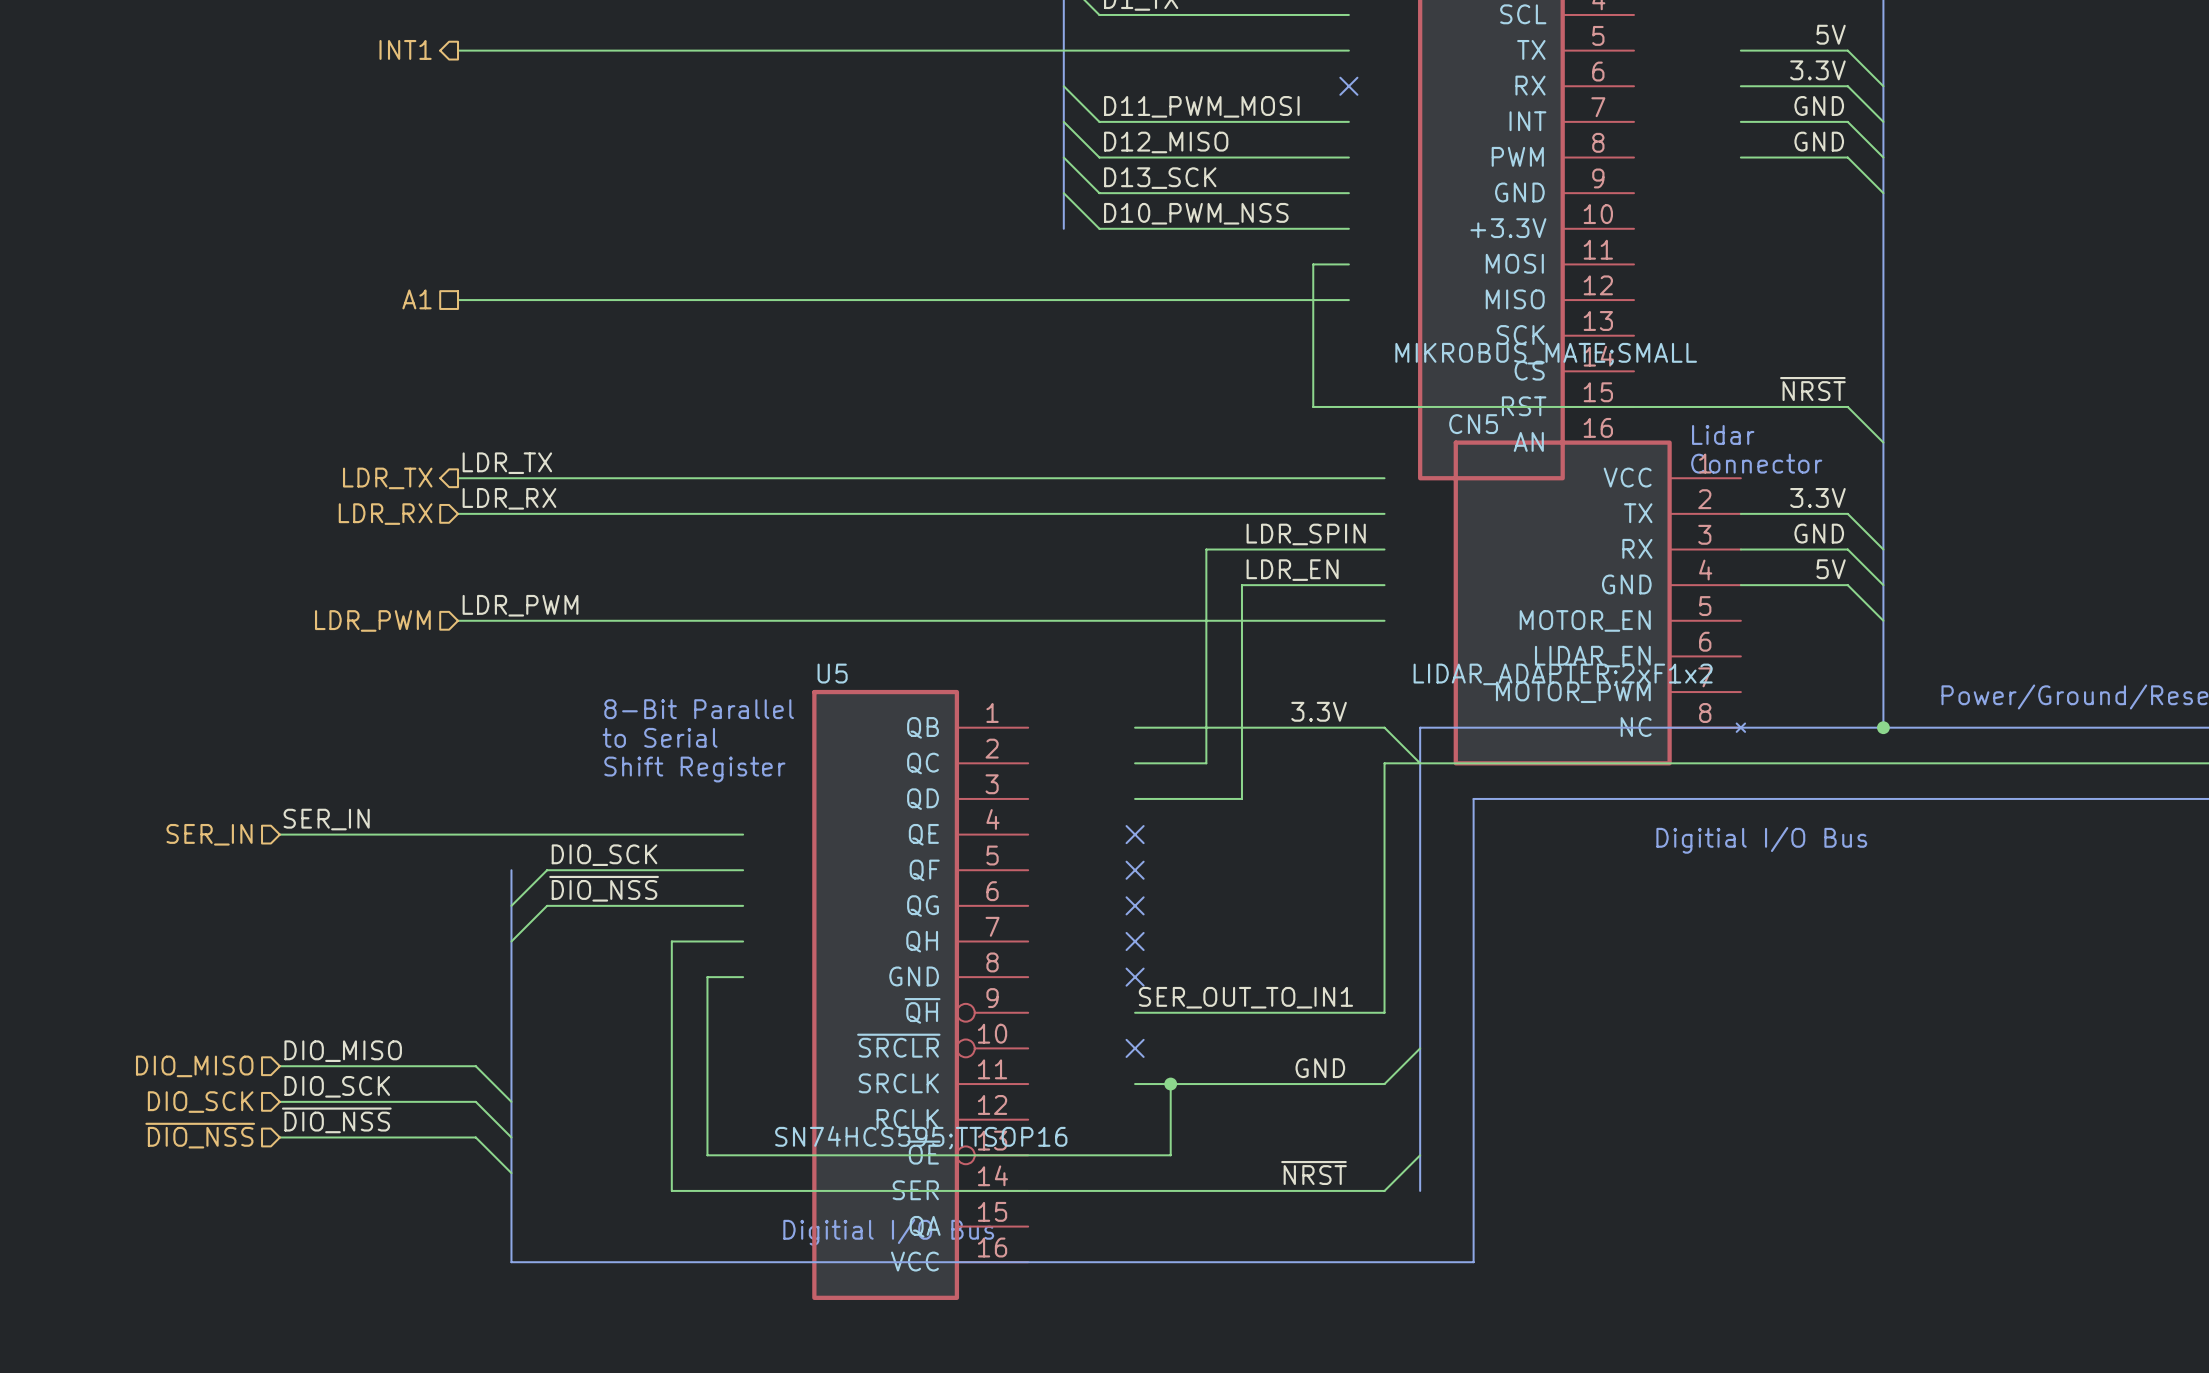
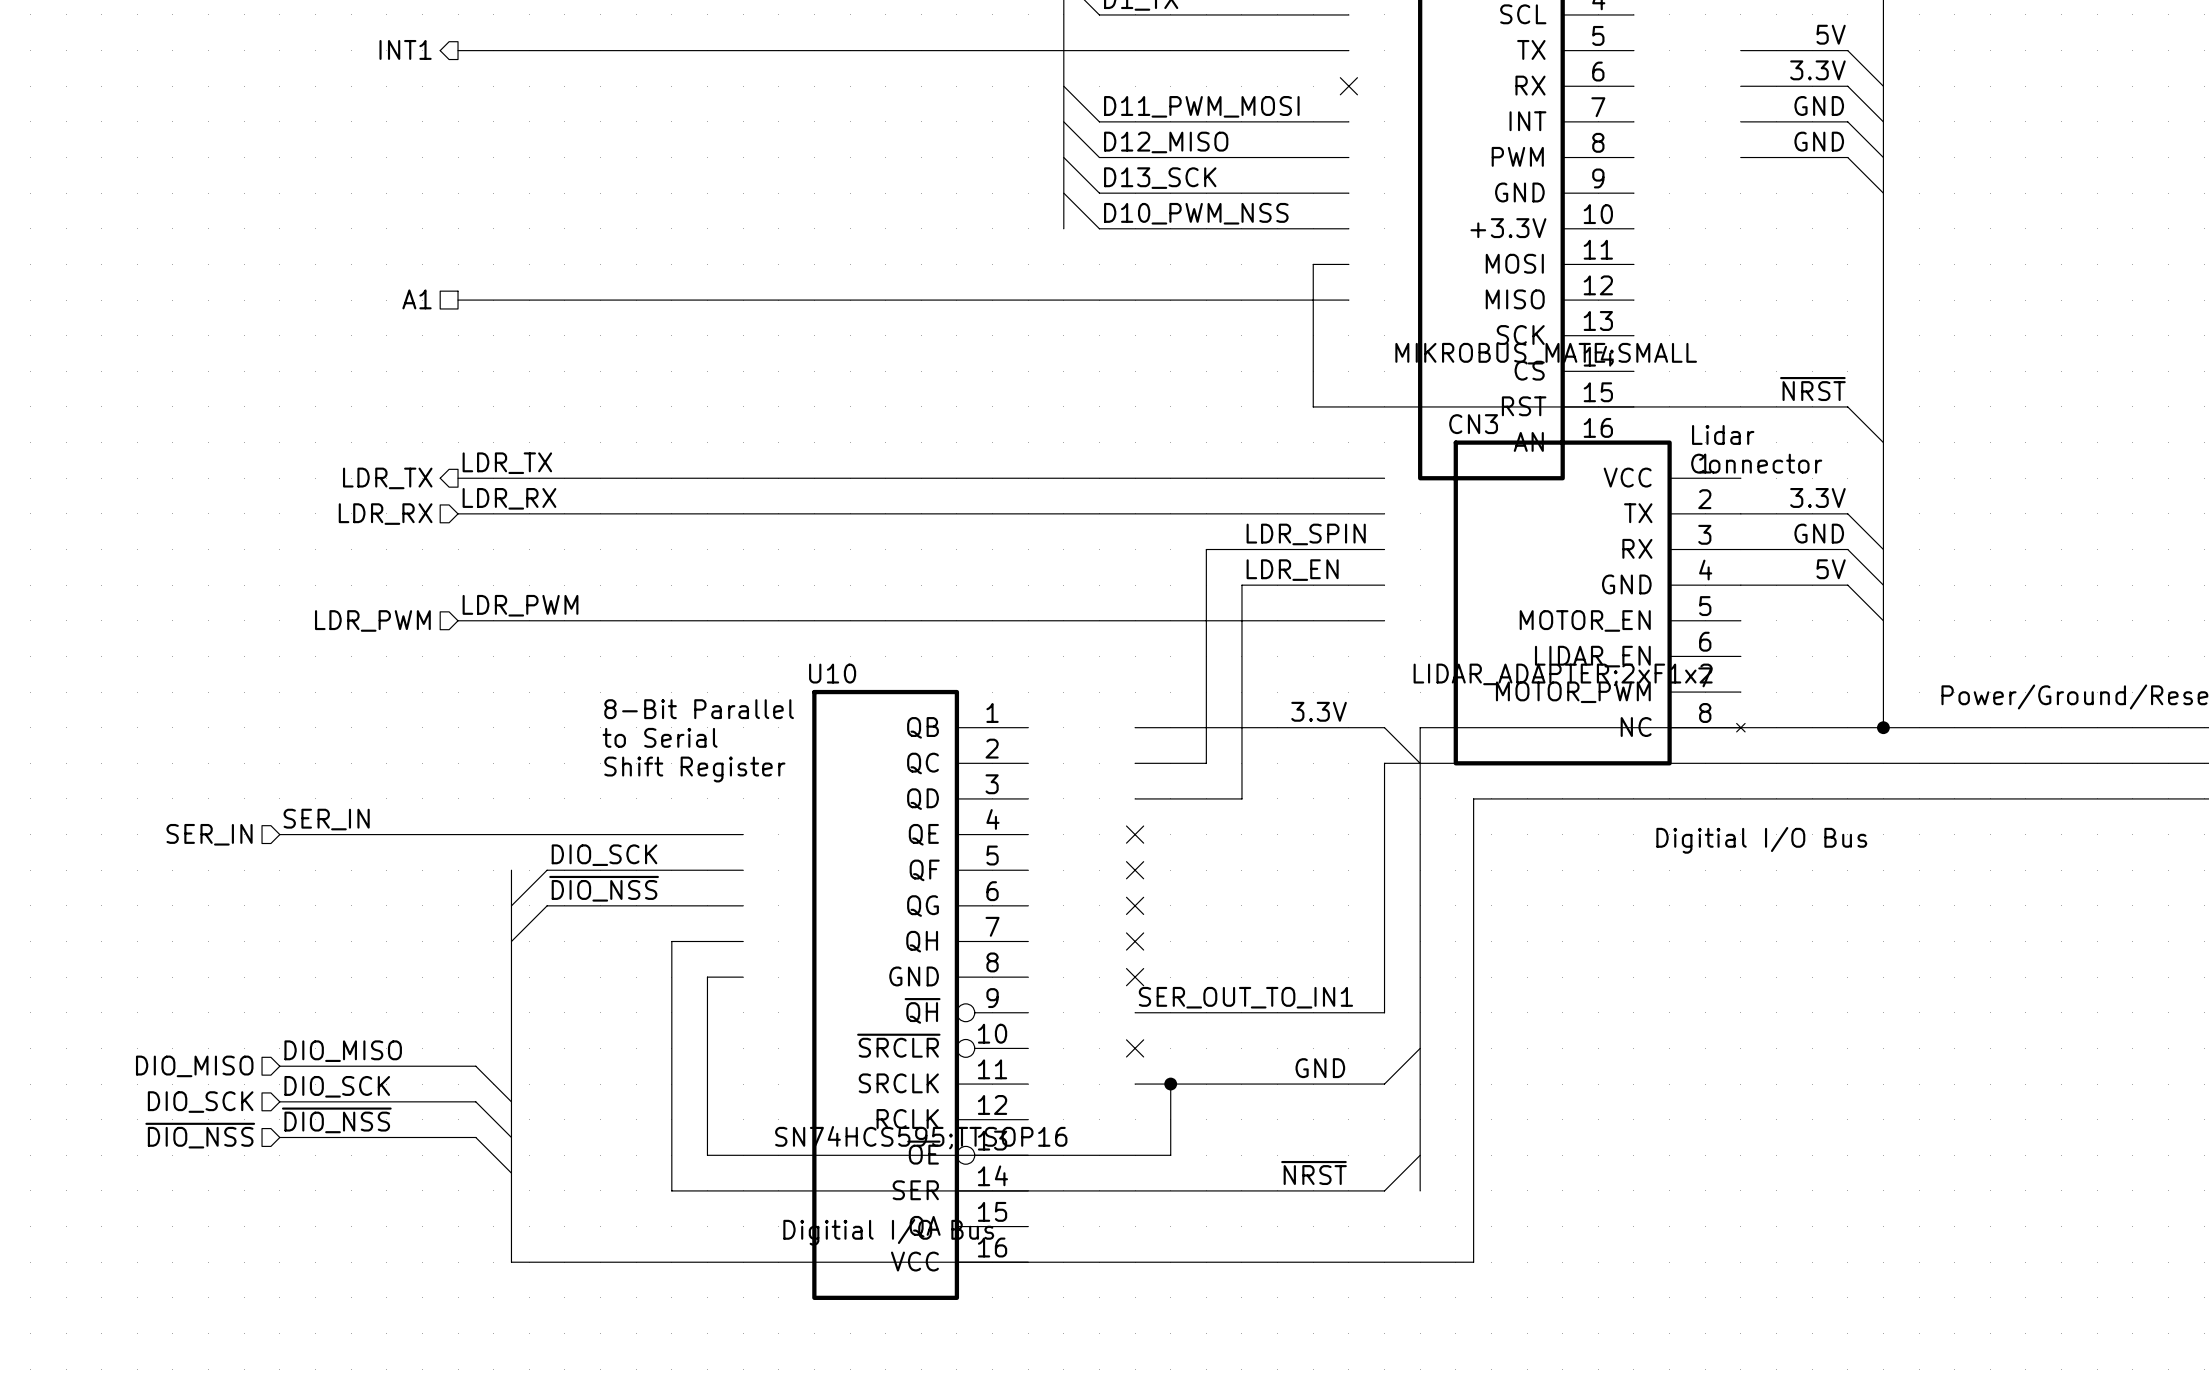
CN5 name: CN5 (1473, 424) -> CN3 (1473, 424)
U5 name: U5 (832, 673) -> U10 (832, 673)

